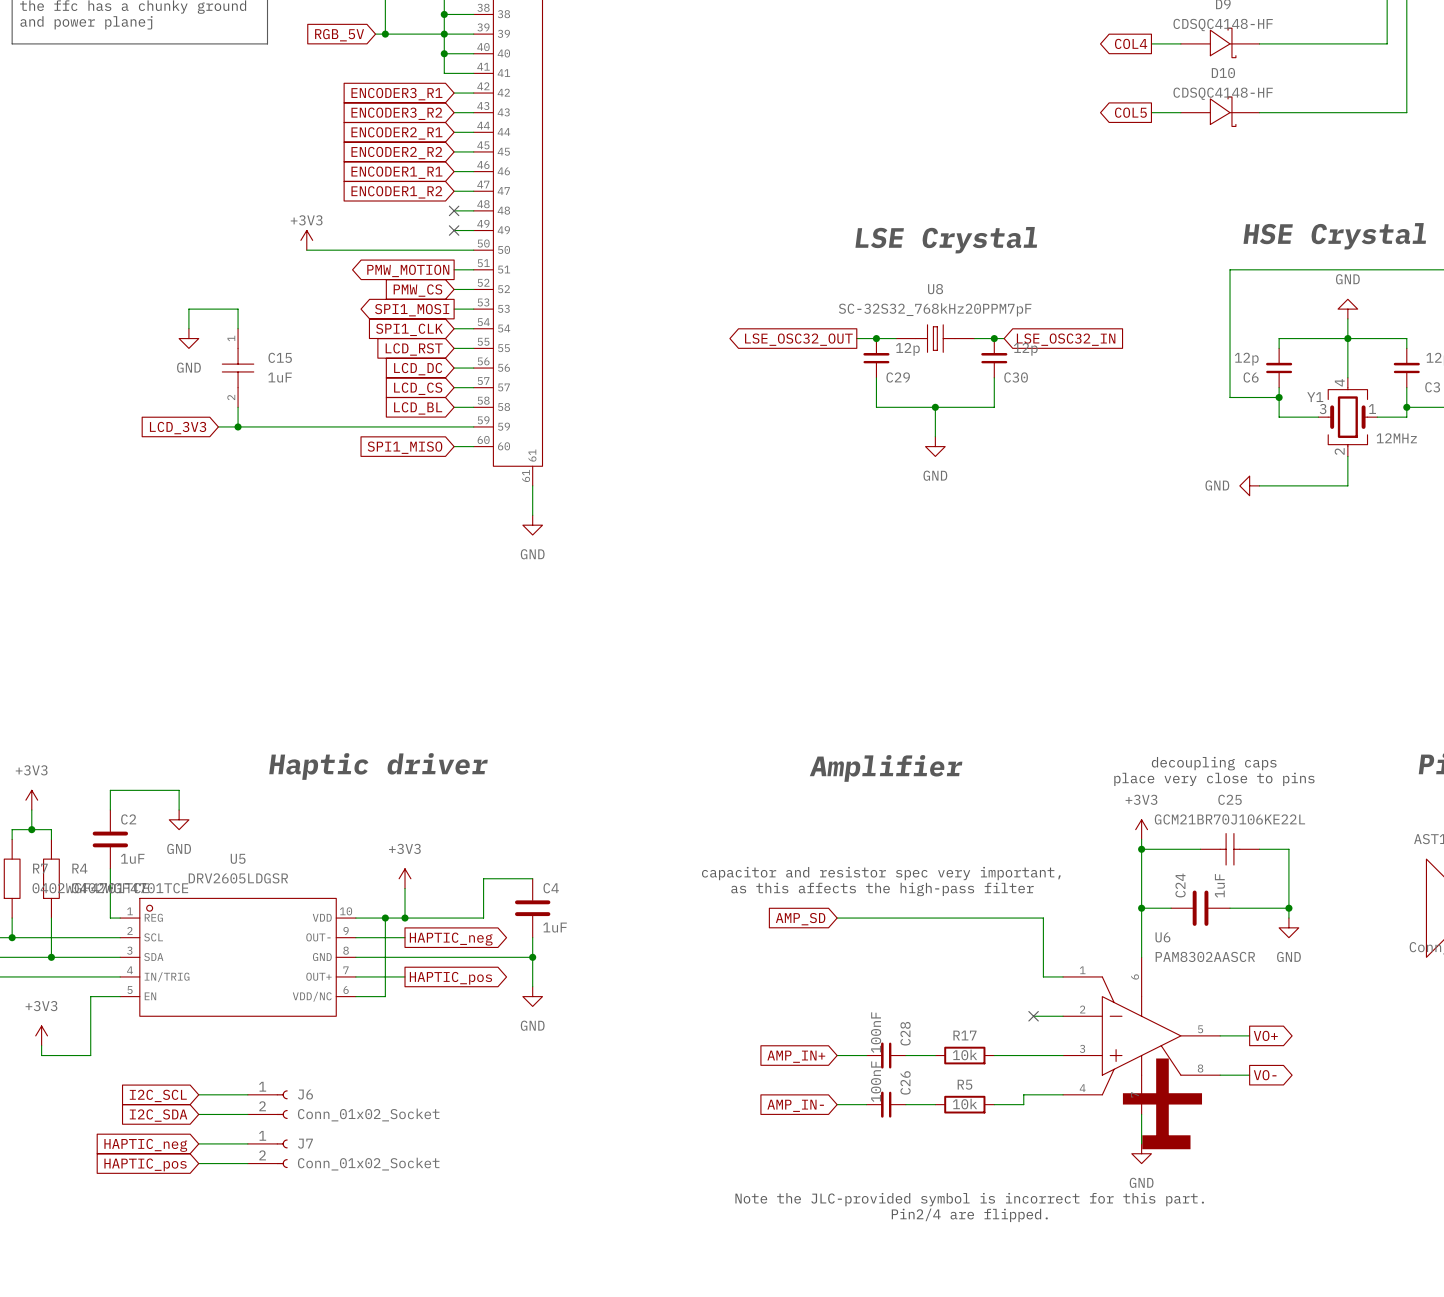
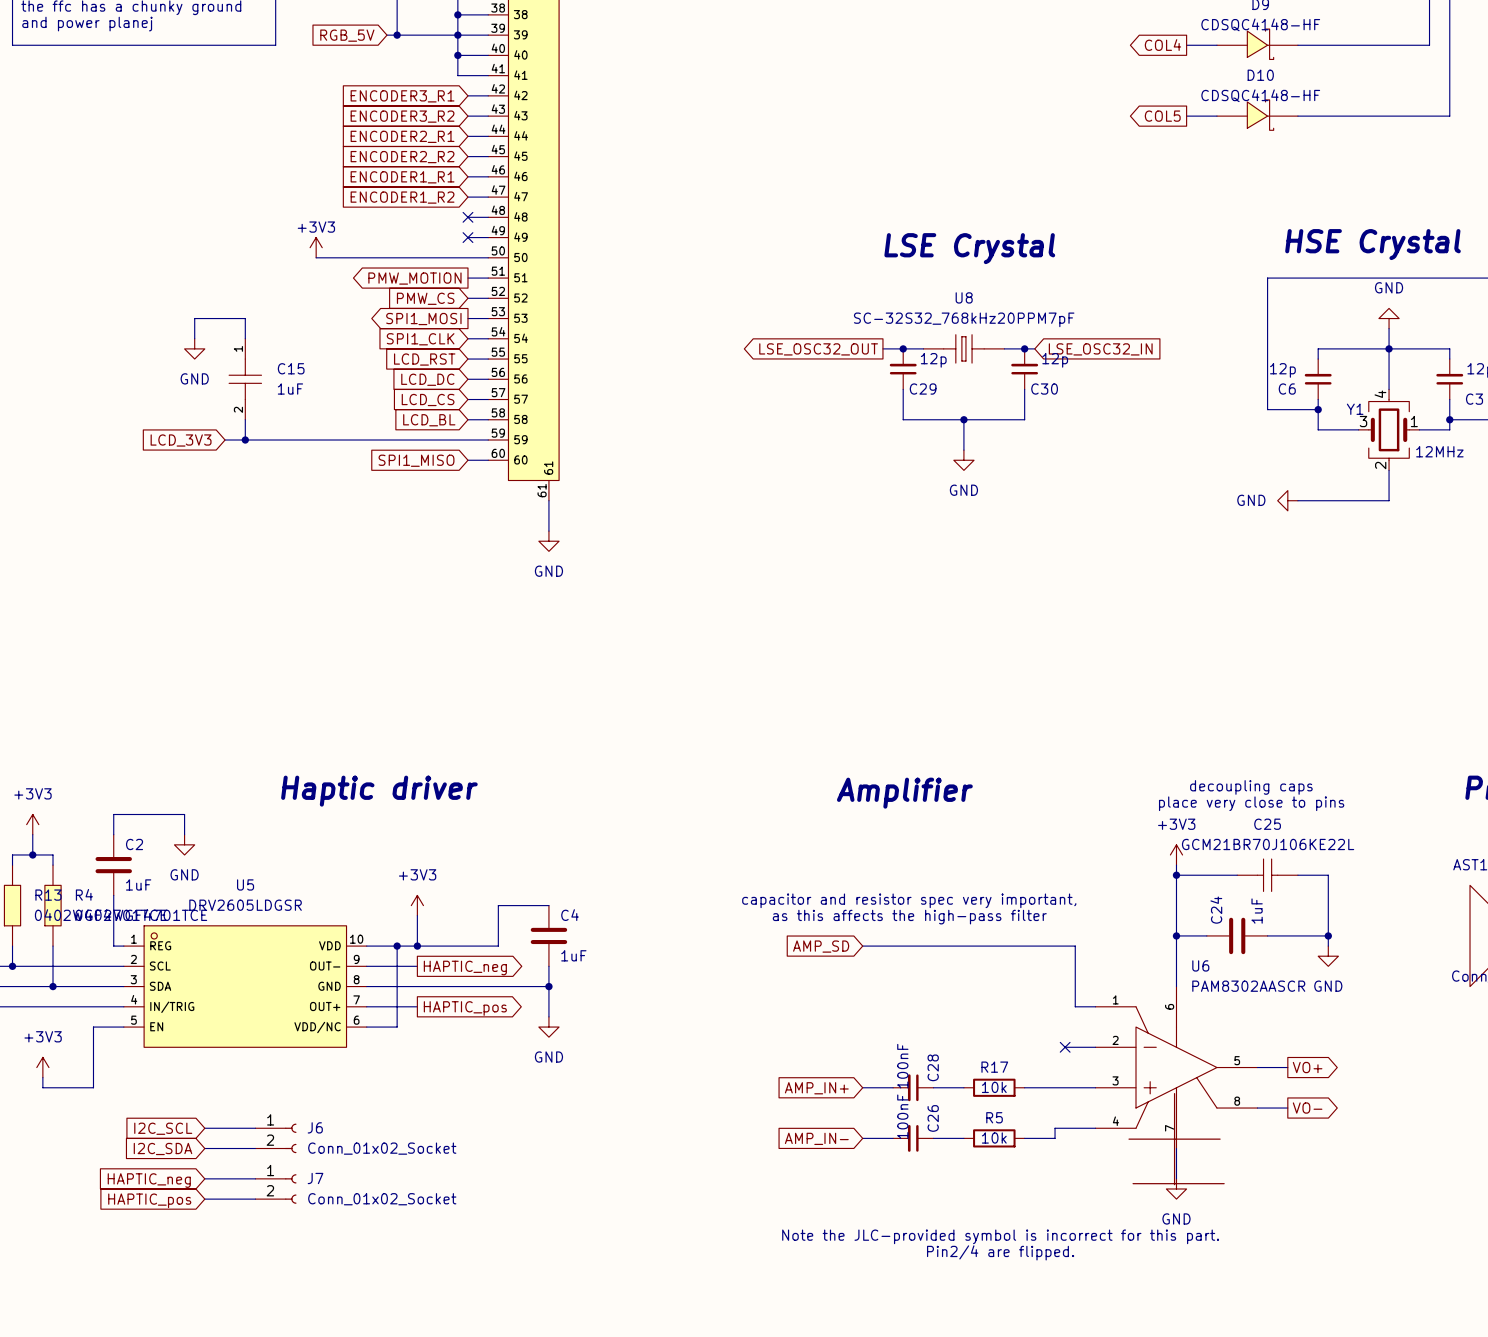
R7 name: R7 (40, 868) -> R13 (48, 895)

